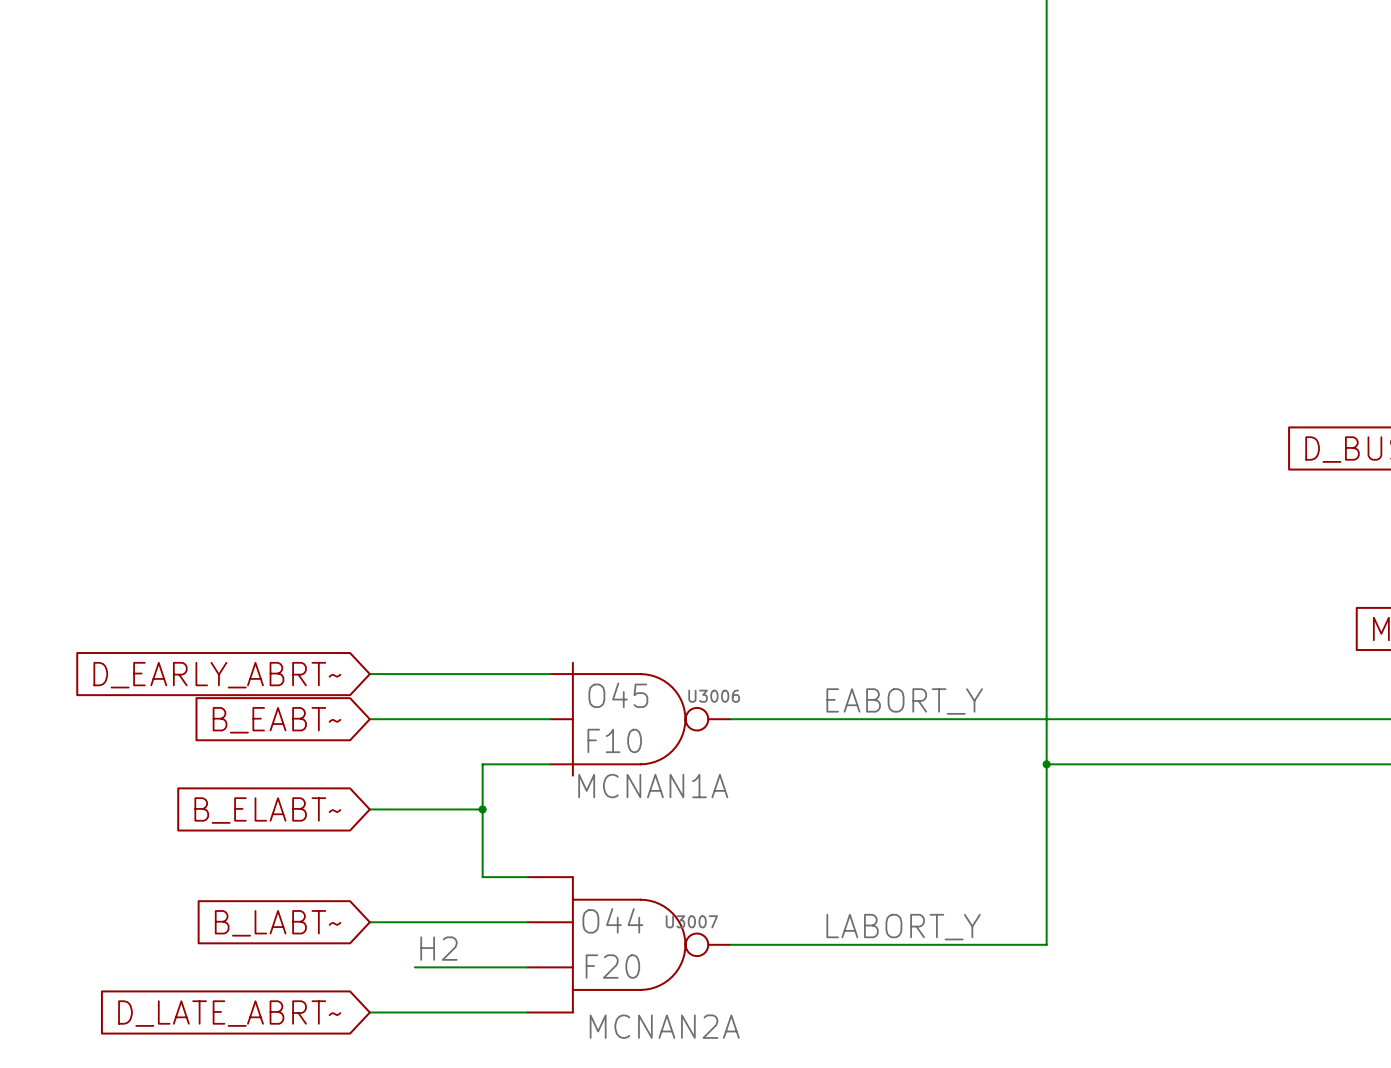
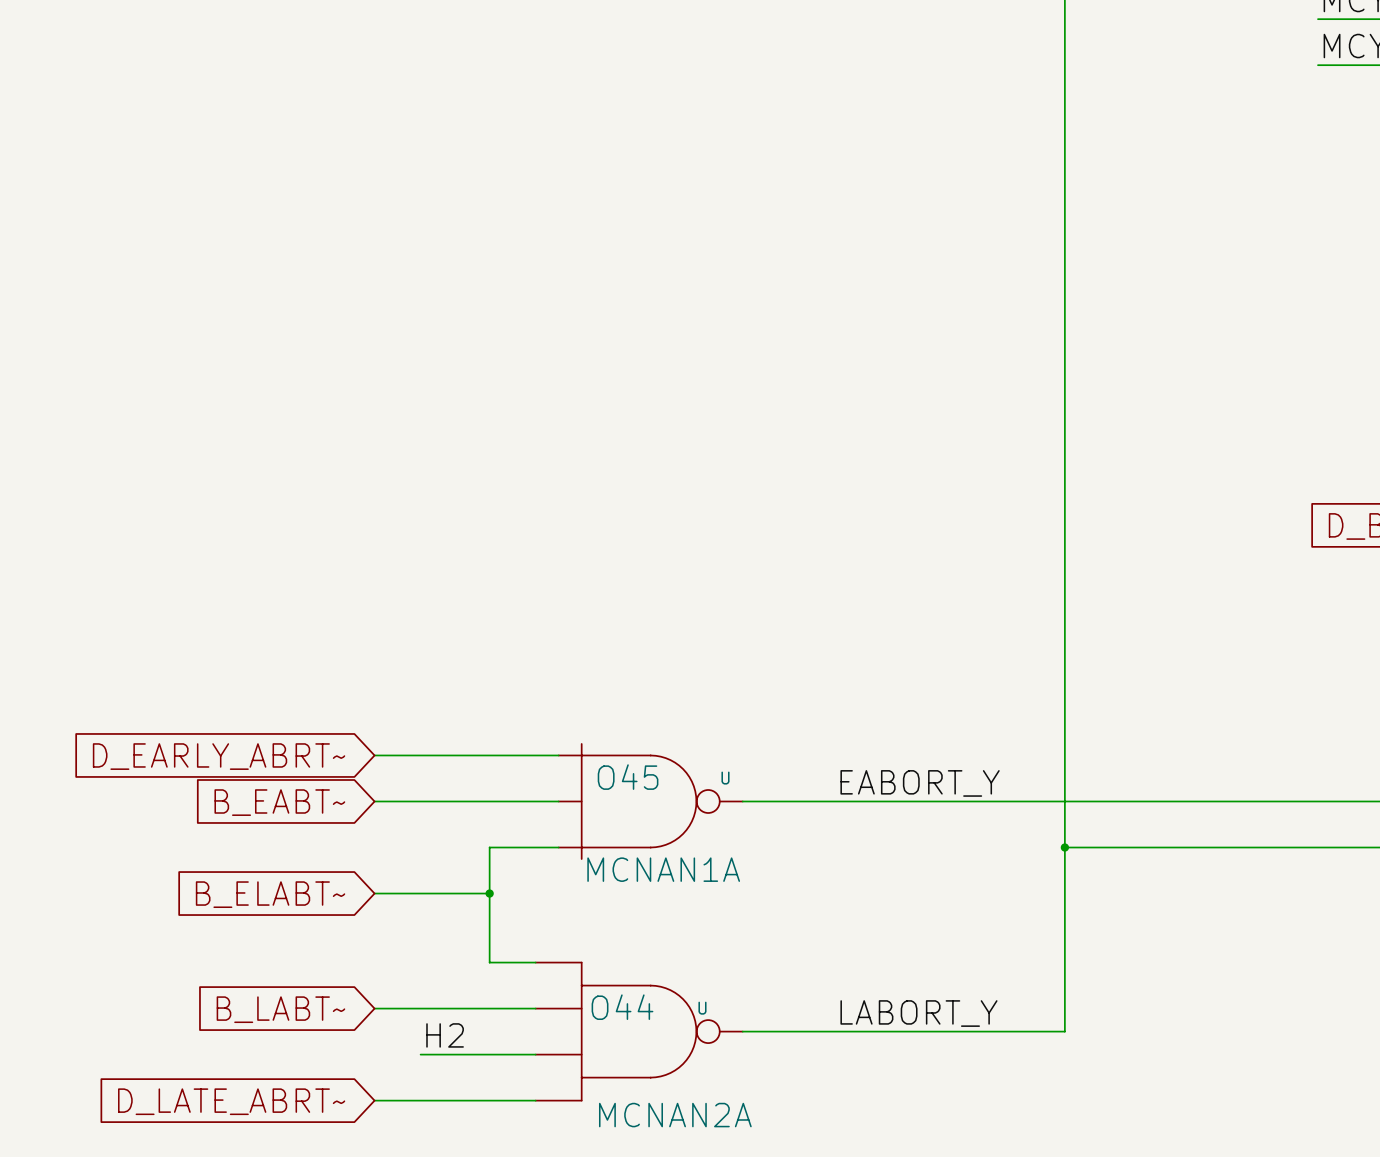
U3006 name: U3006 (714, 696) -> U (725, 778)
U3006 value: F10 (614, 740) -> none
U3007 name: U3007 (691, 921) -> U (702, 1008)
U3007 value: F20 (612, 966) -> none

